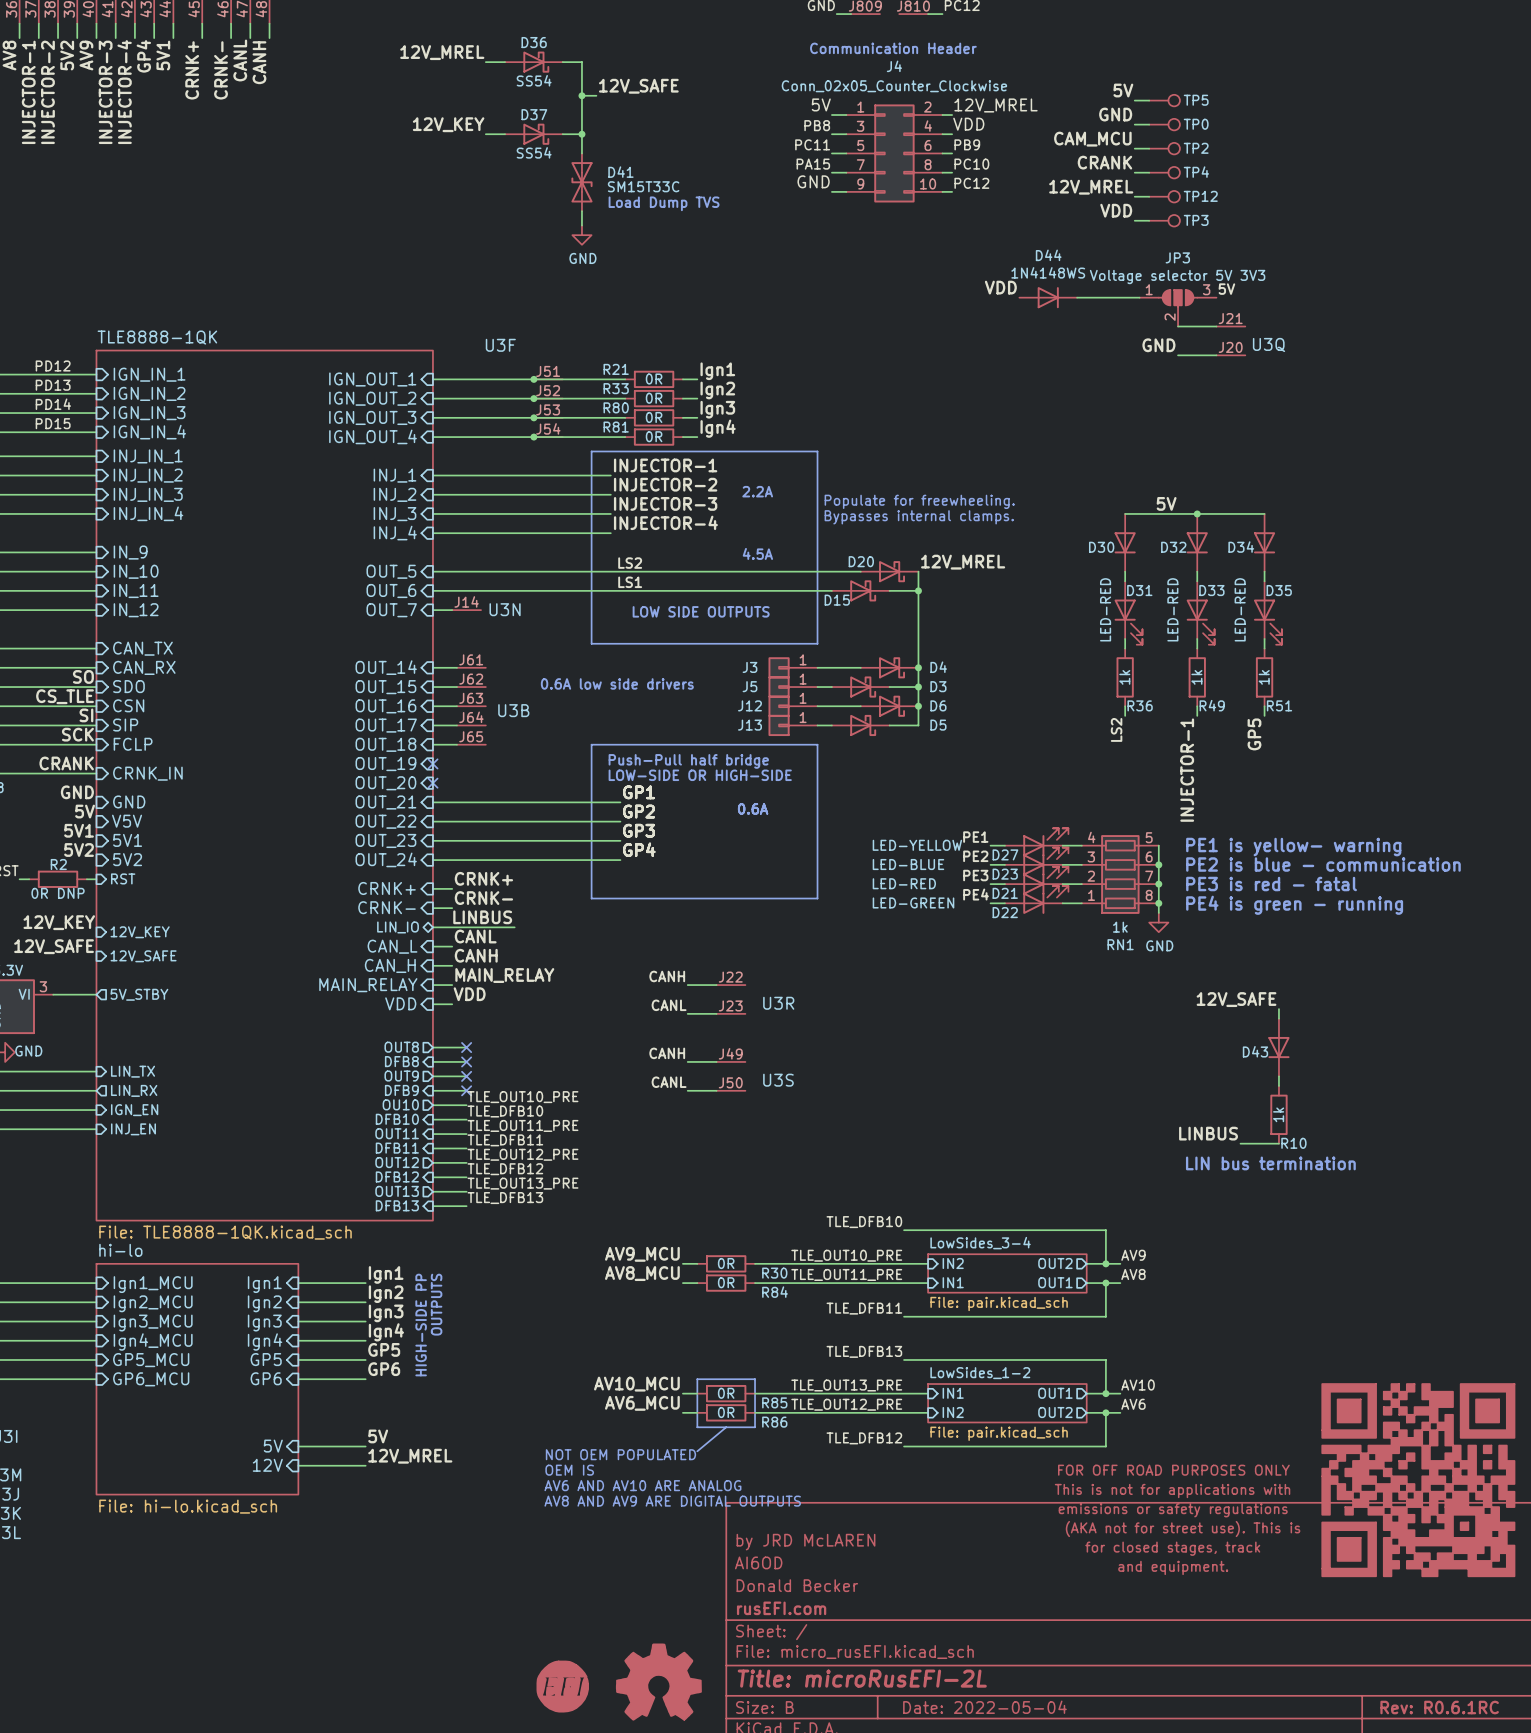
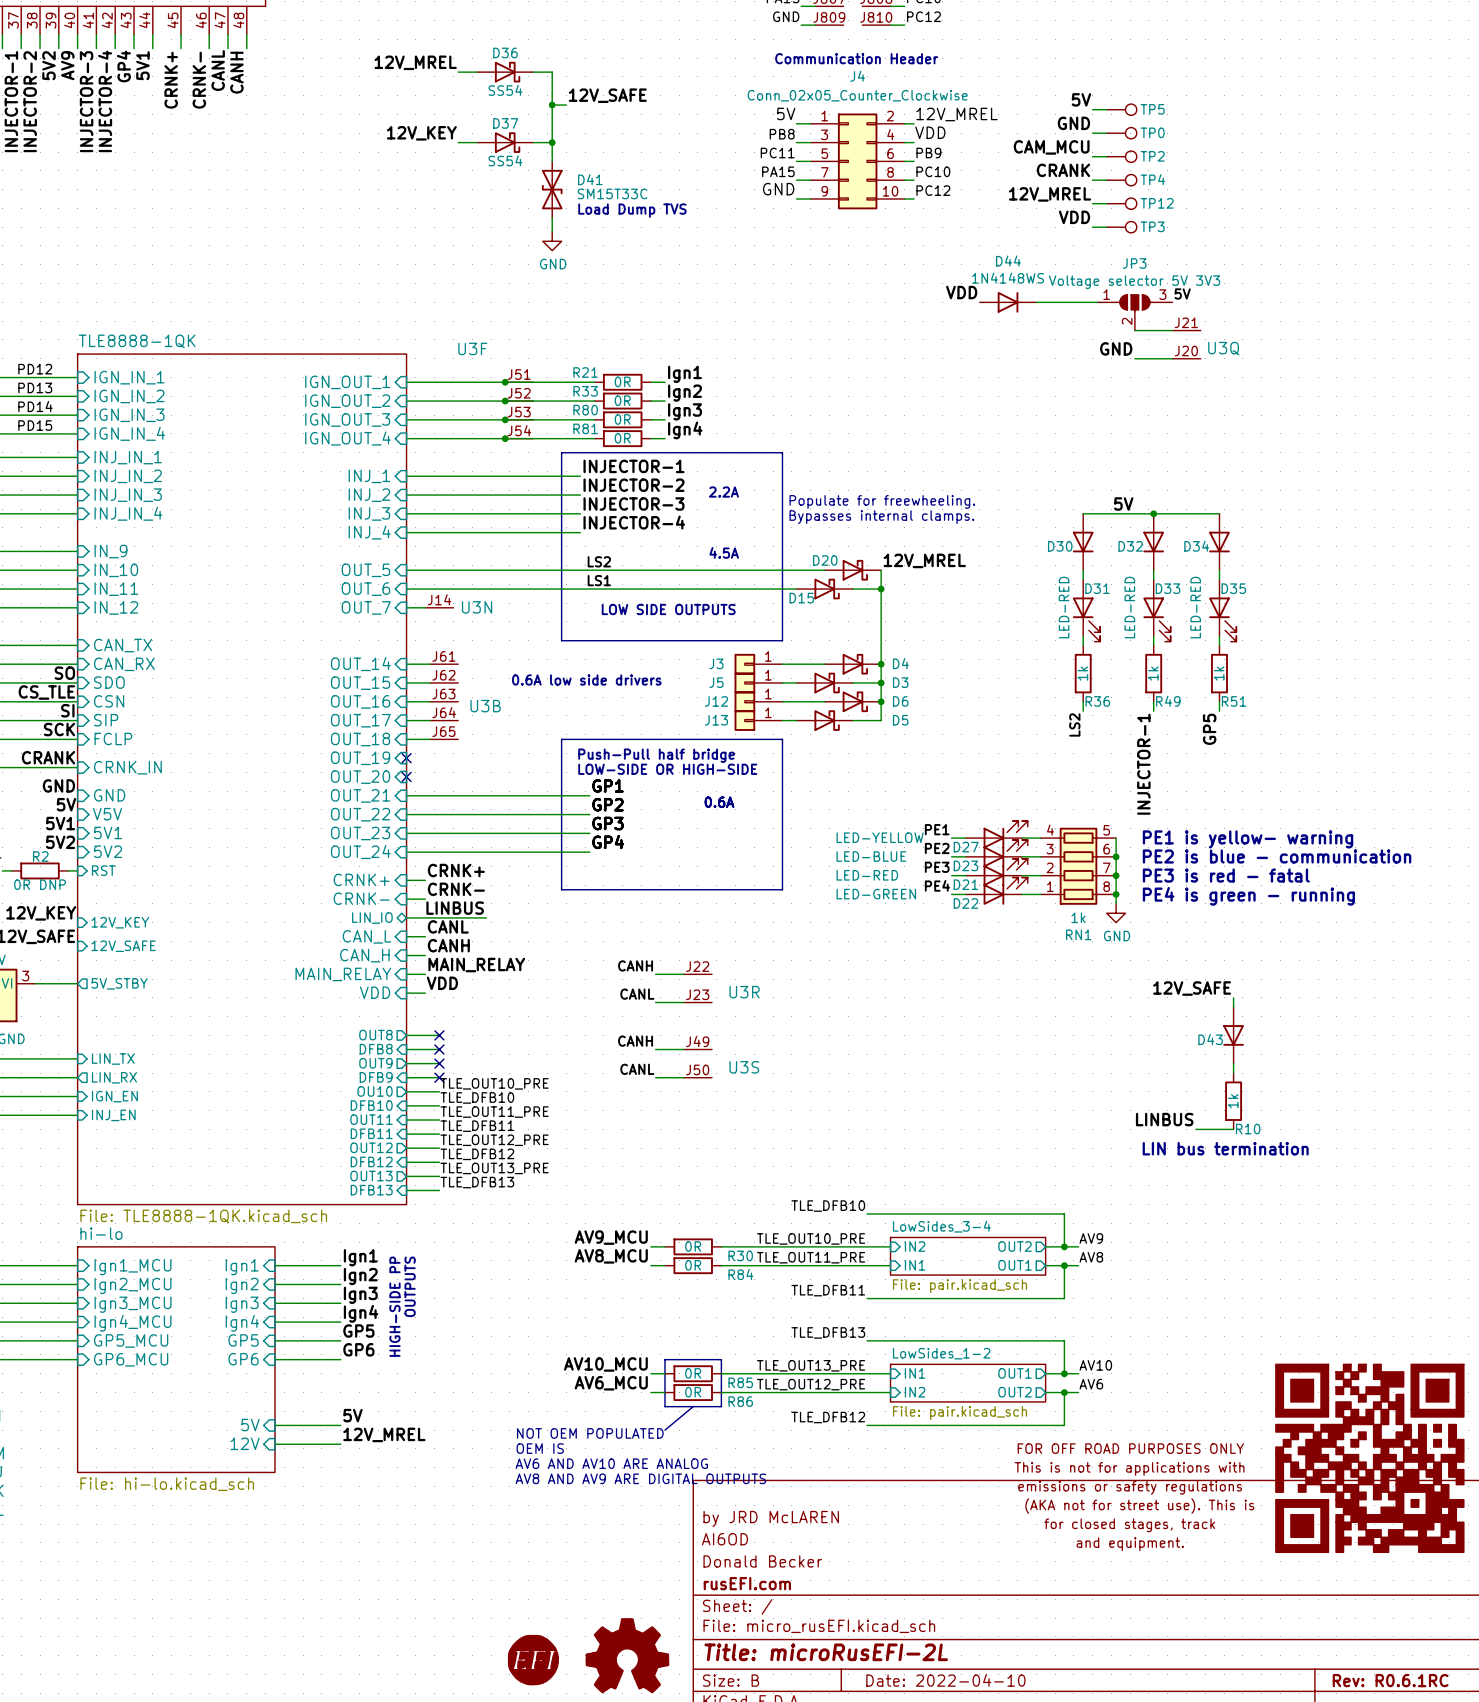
title block: Date: 2022-05-04 (984, 1707) -> Date: 2022-04-10 (945, 1680)

